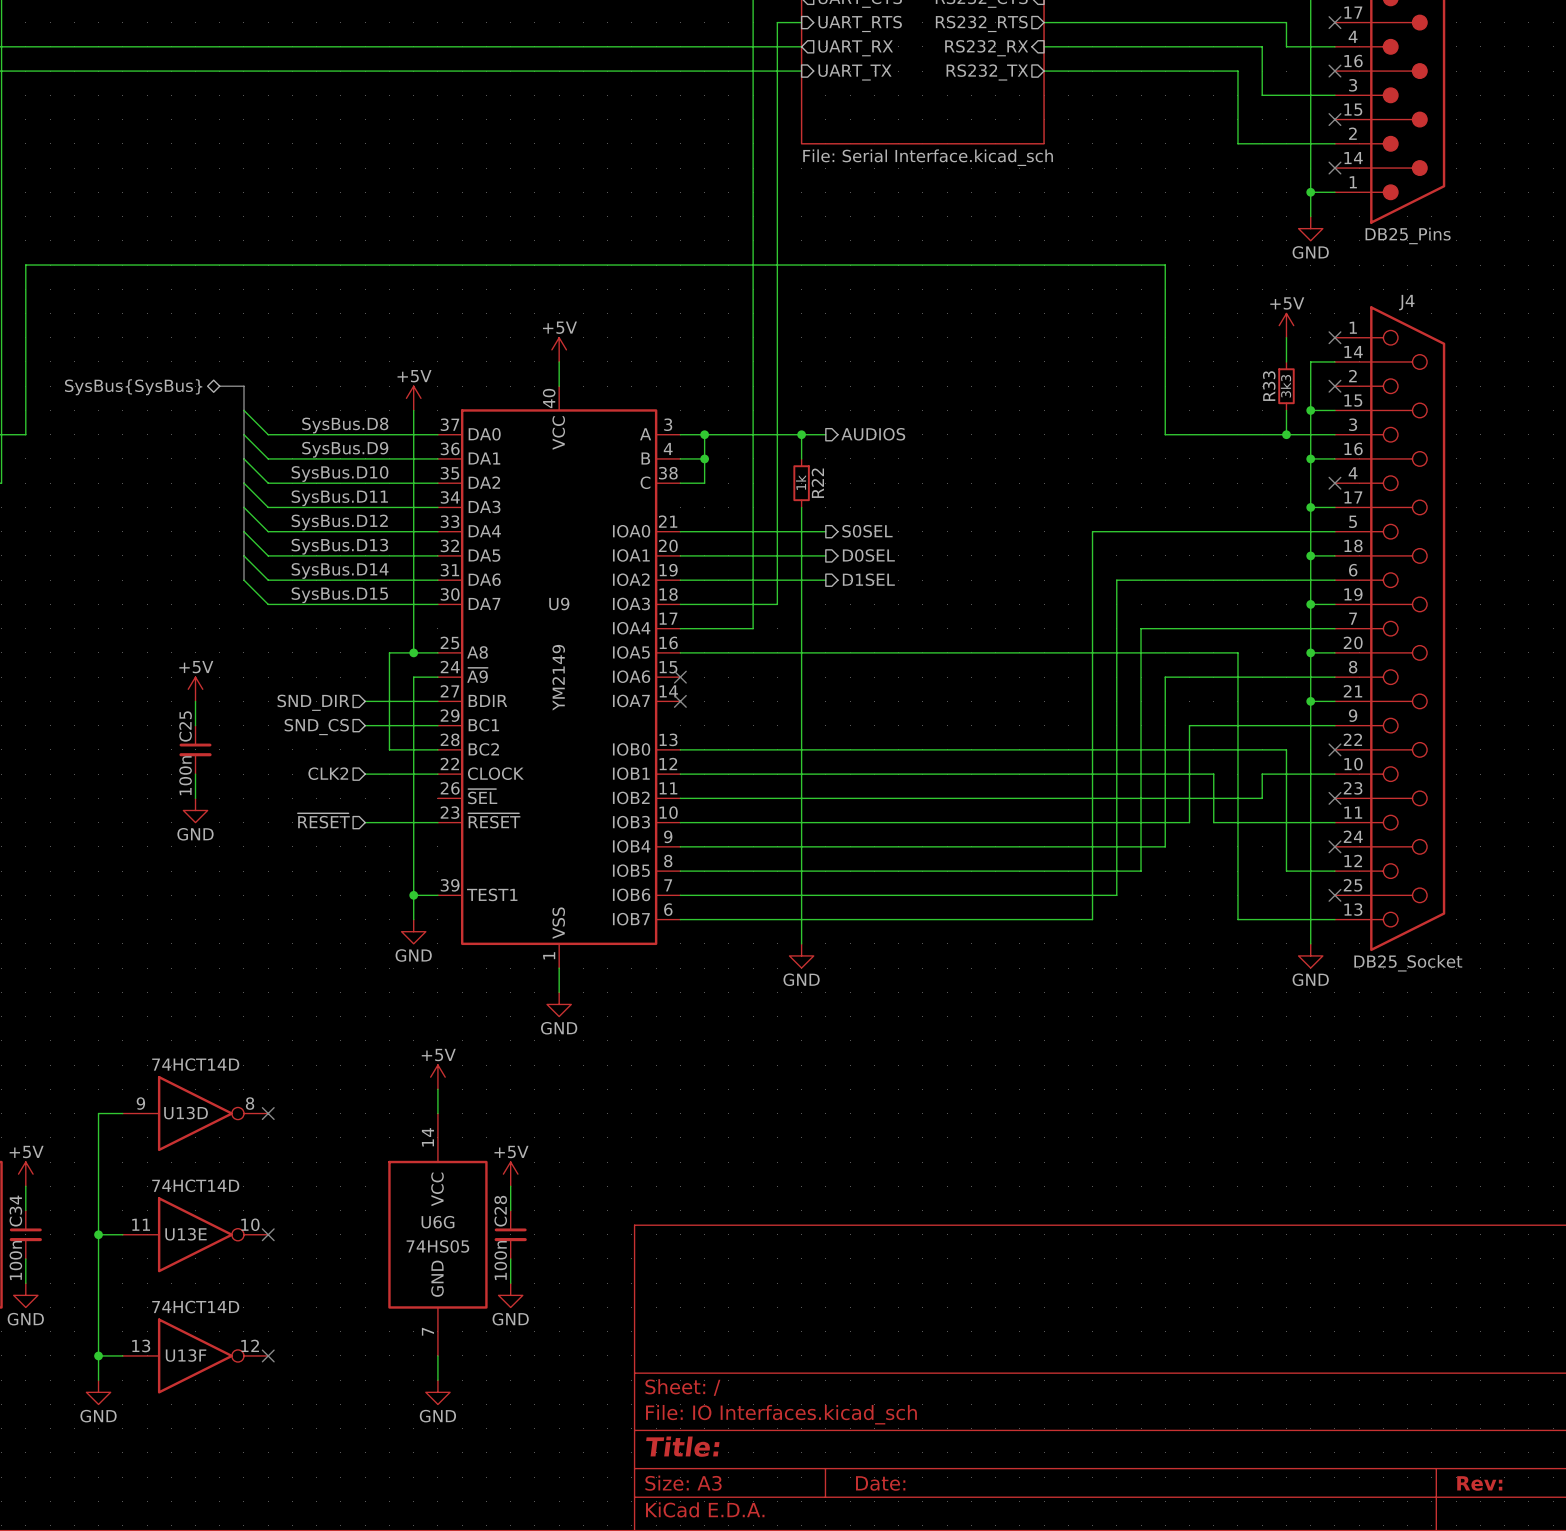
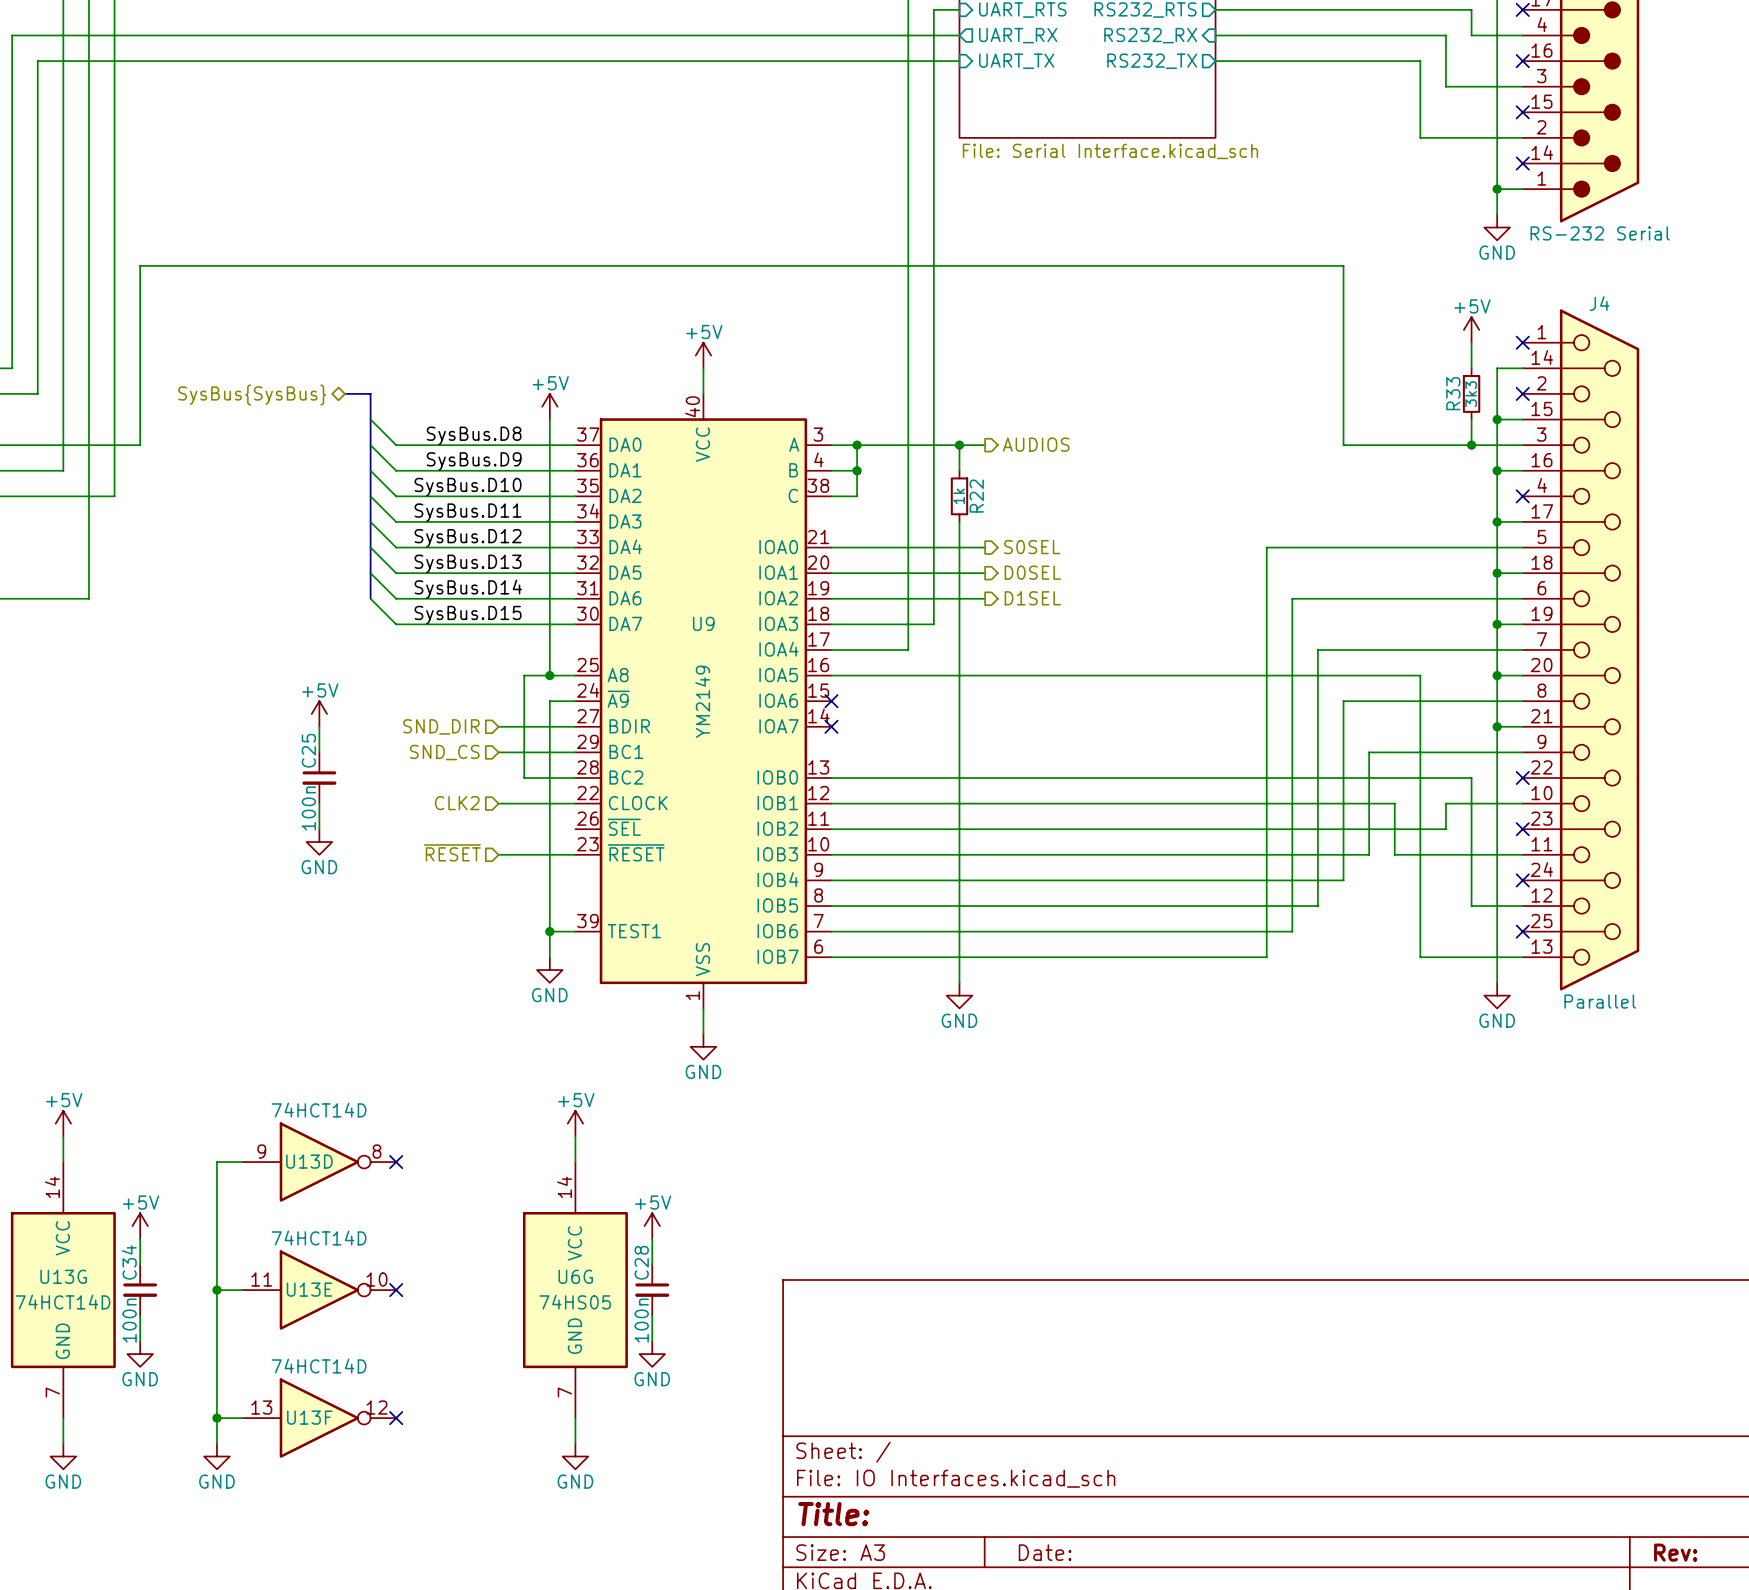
part value: DB25_Pins (1408, 235) -> RS-232 Serial (1600, 233)
J4 value: DB25_Socket (1408, 963) -> Parallel (1600, 1001)

